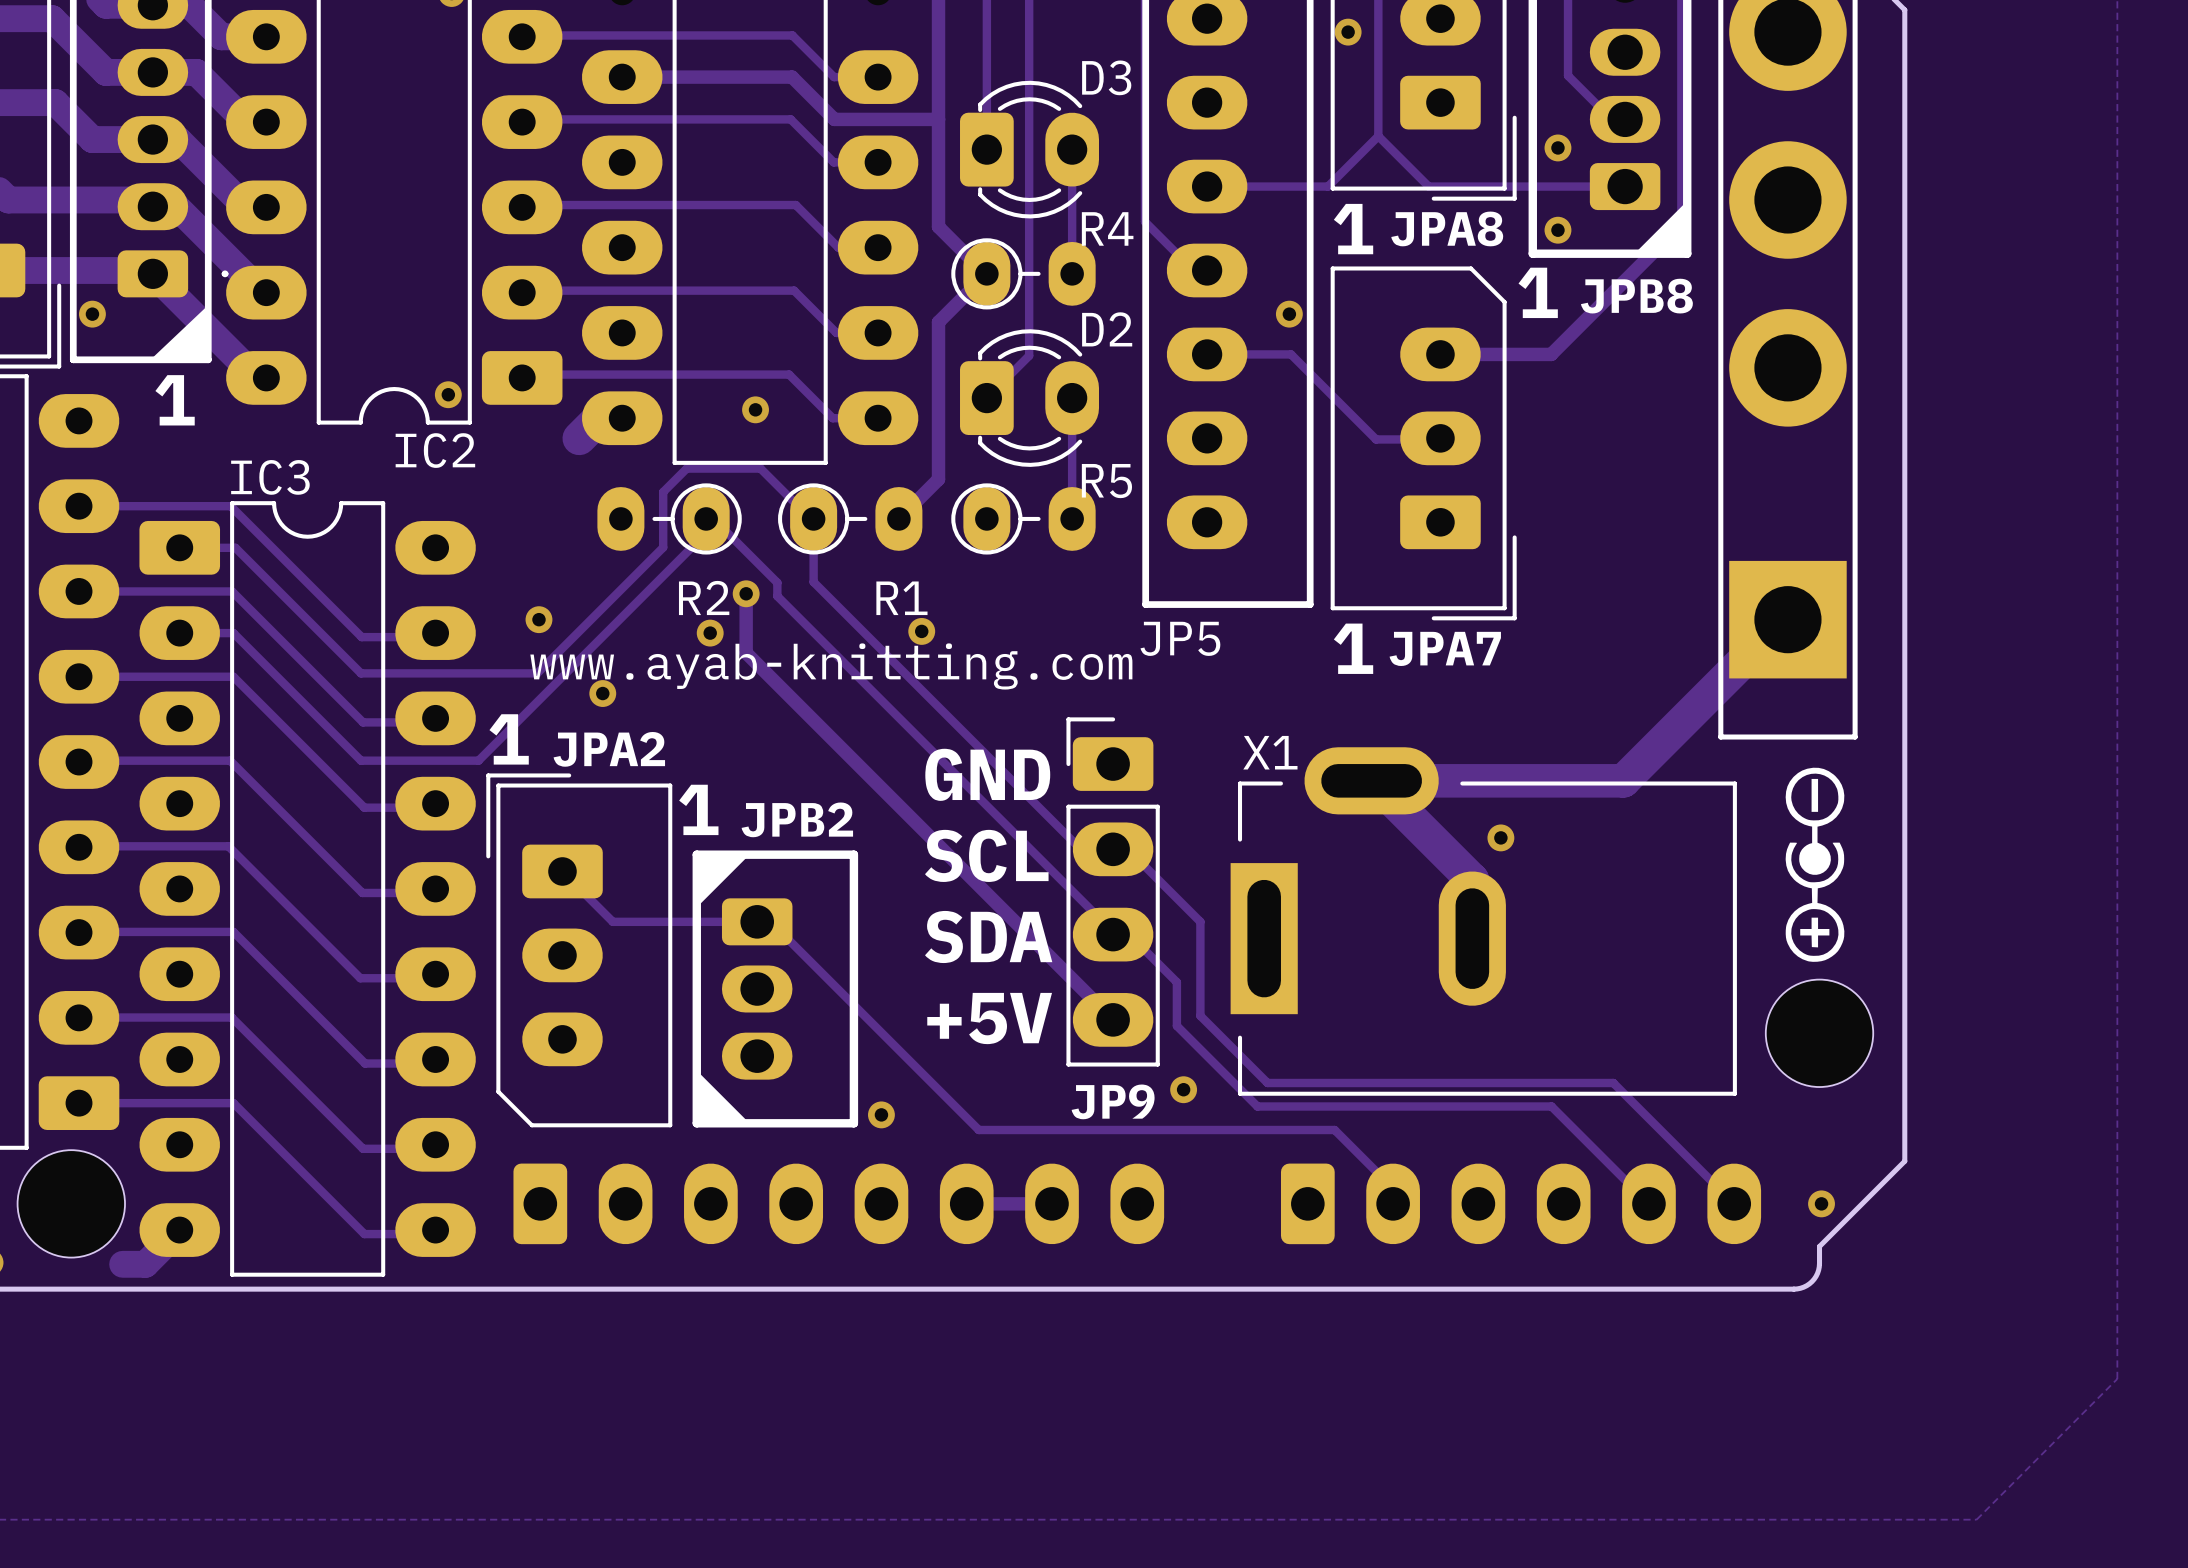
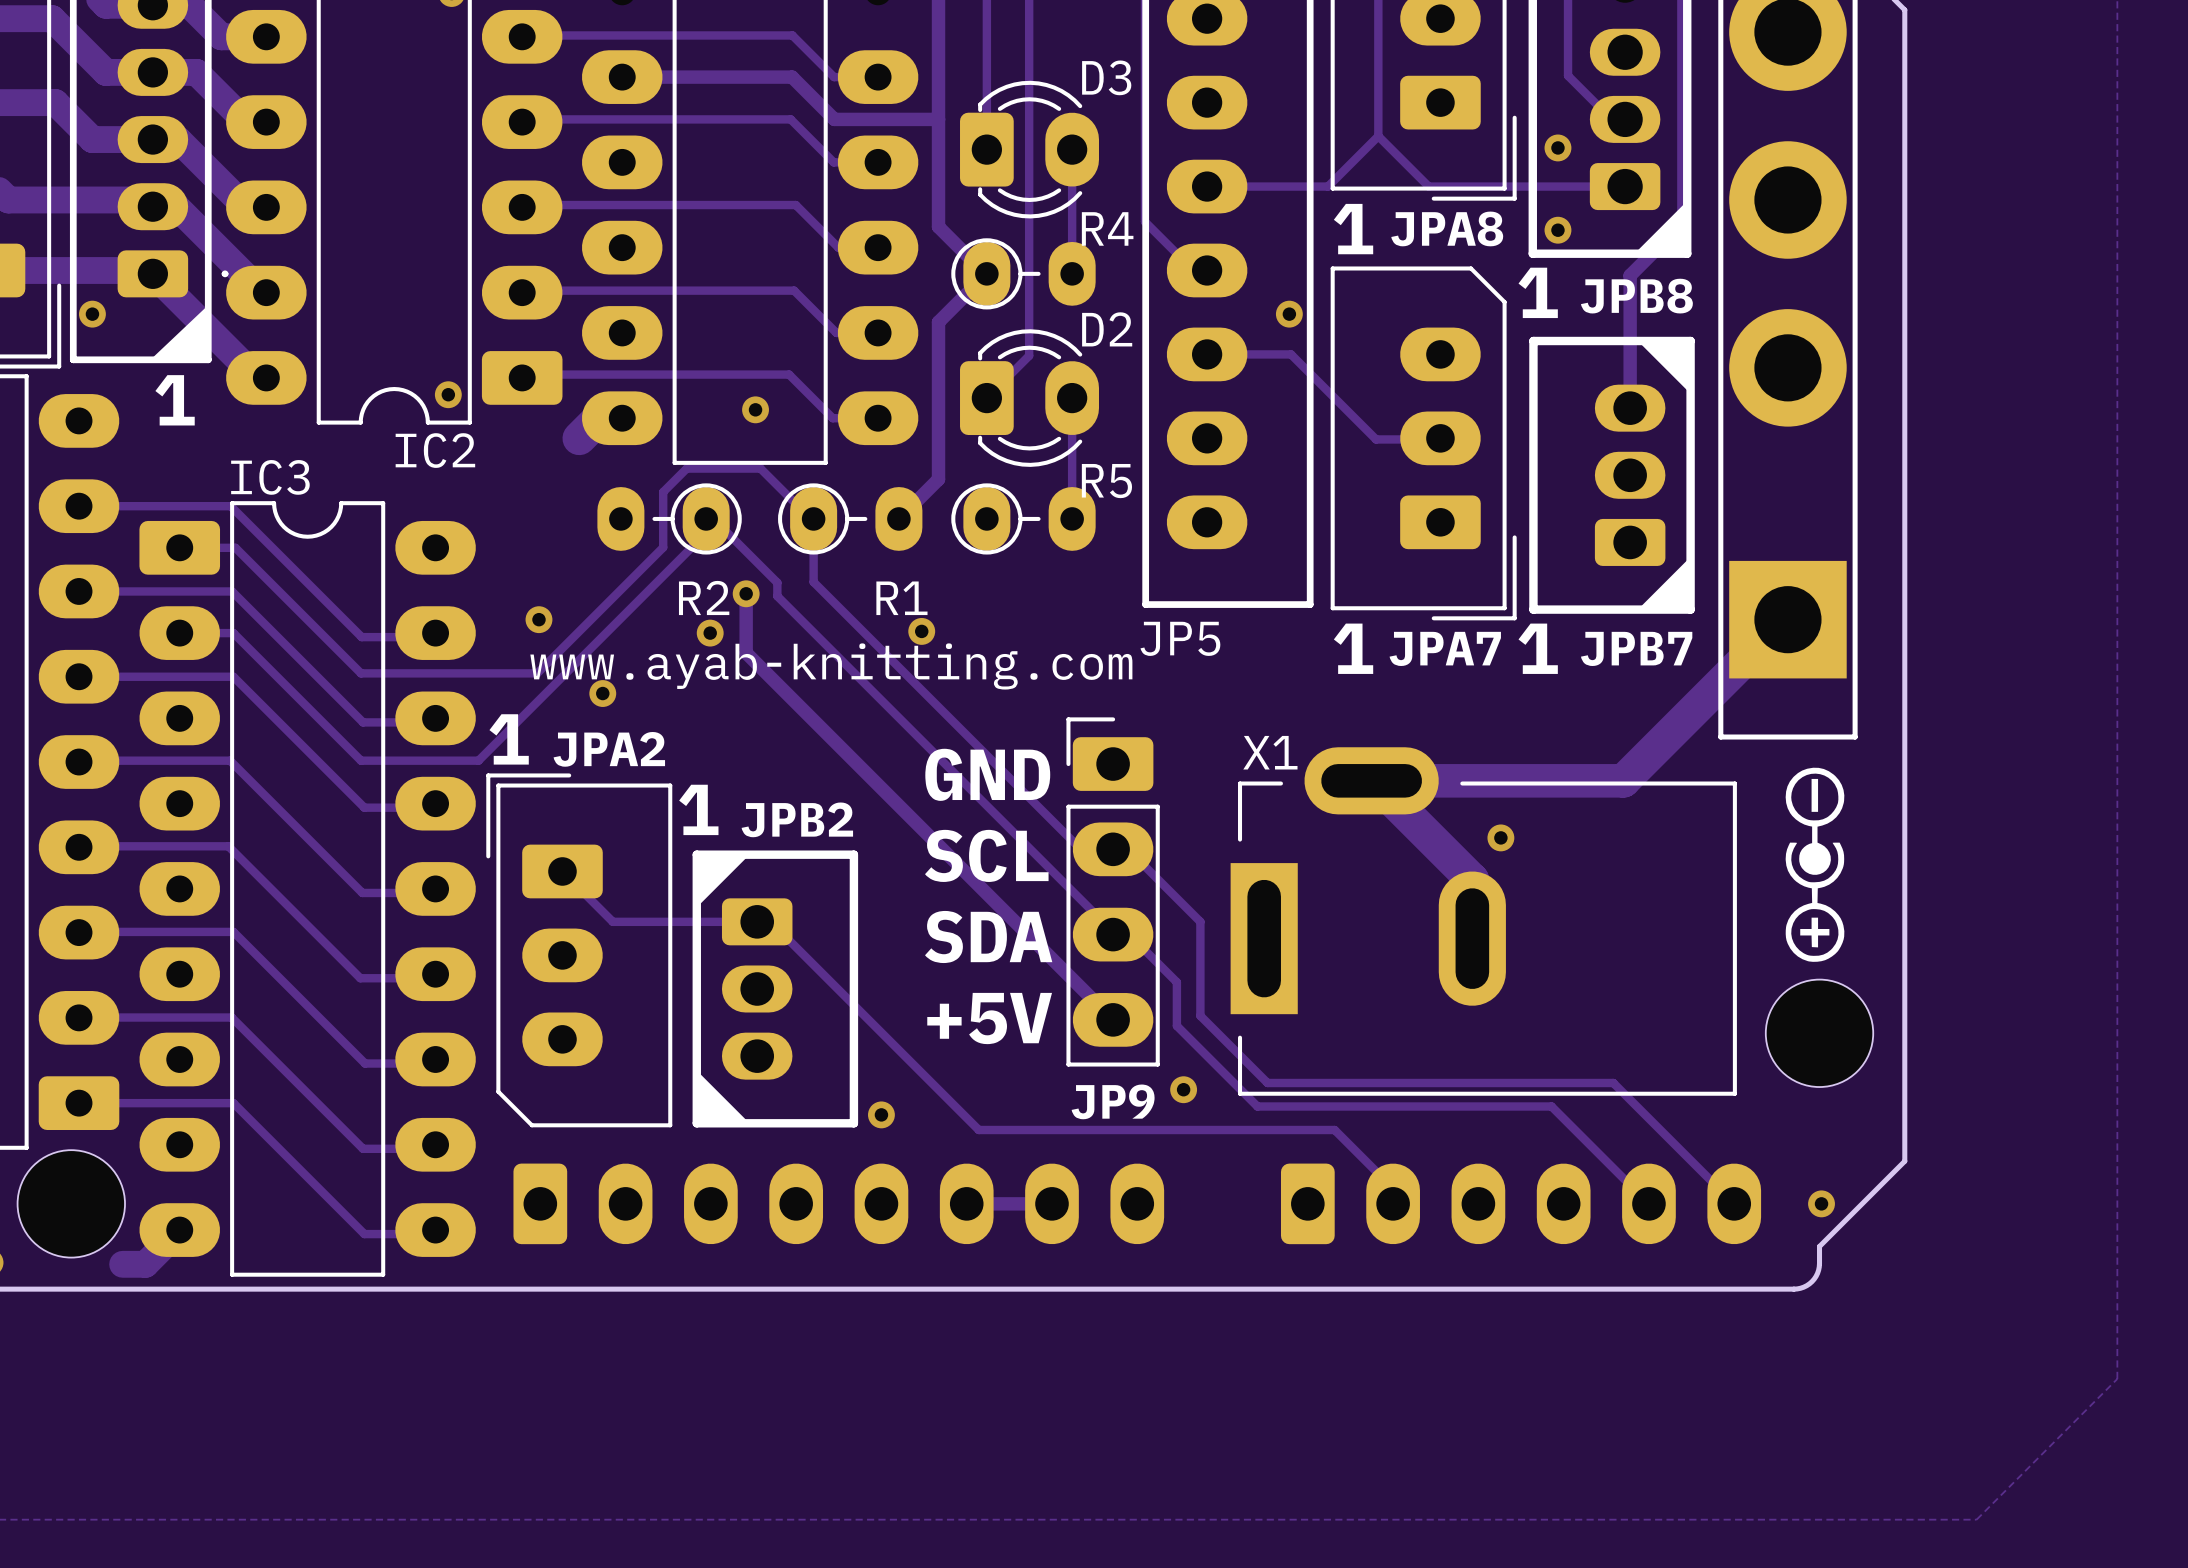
via: (1348, 32) -> none
track: (1630, 275) (1551, 354) (1440, 354) -> (1630, 275) (1630, 408)
JPB7: none -> (1612, 475)
text: none -> 1 (1538, 648)

